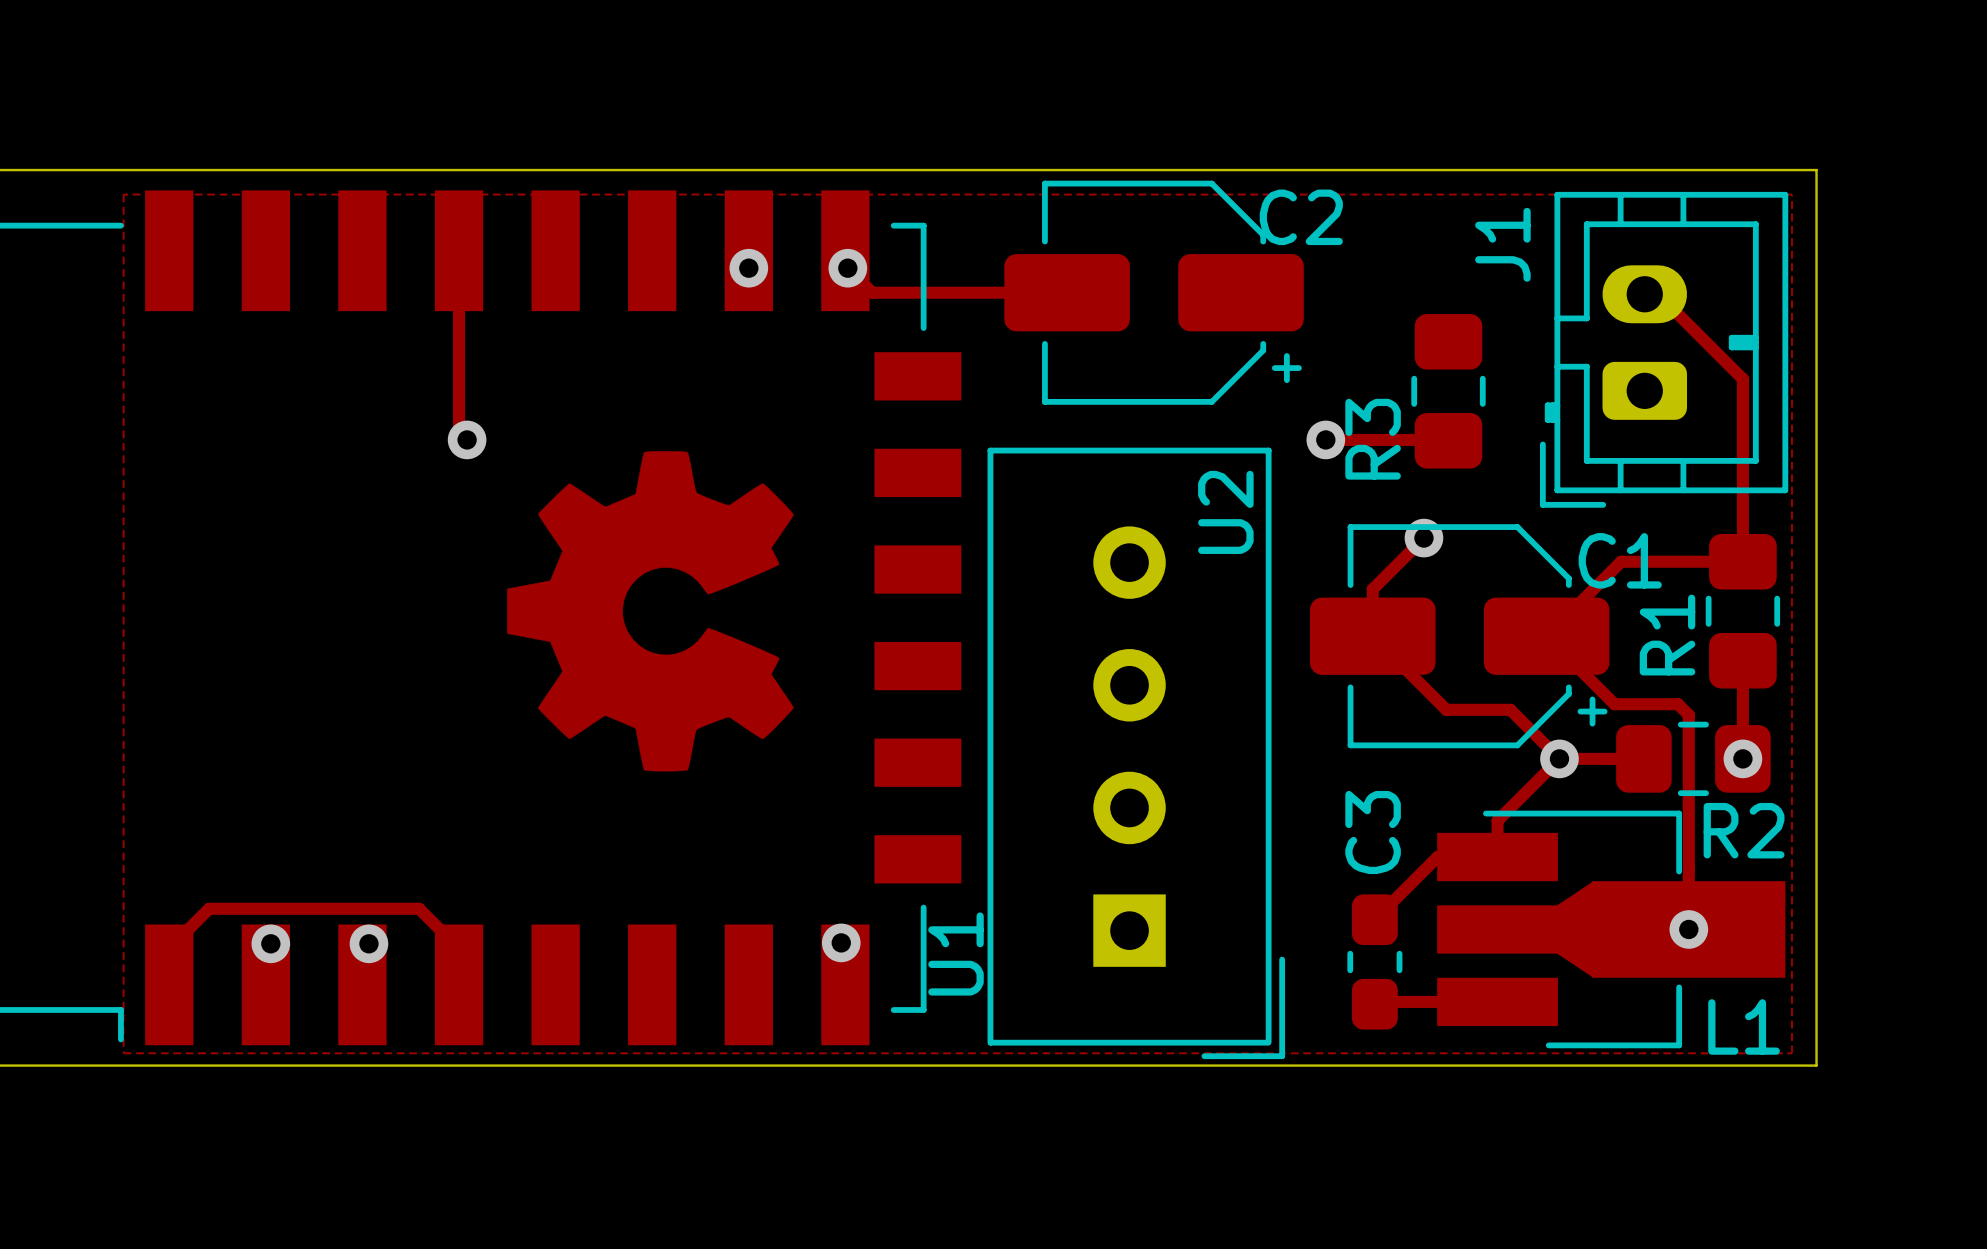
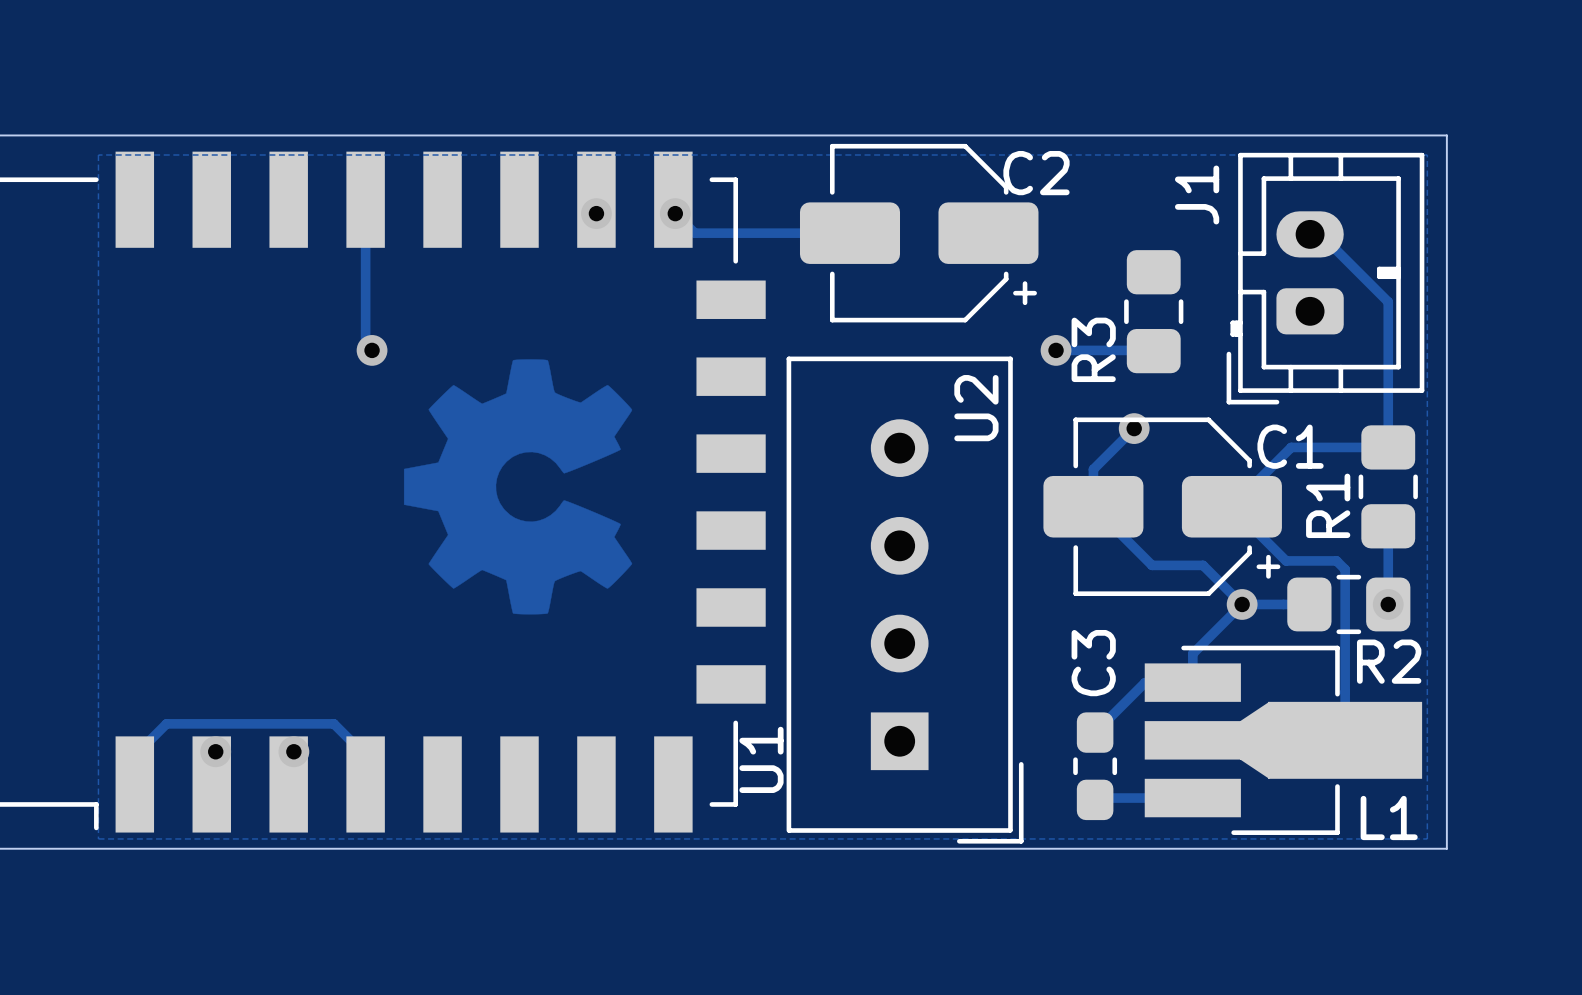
via: (1688, 929) -> none
via: (841, 942) -> none

